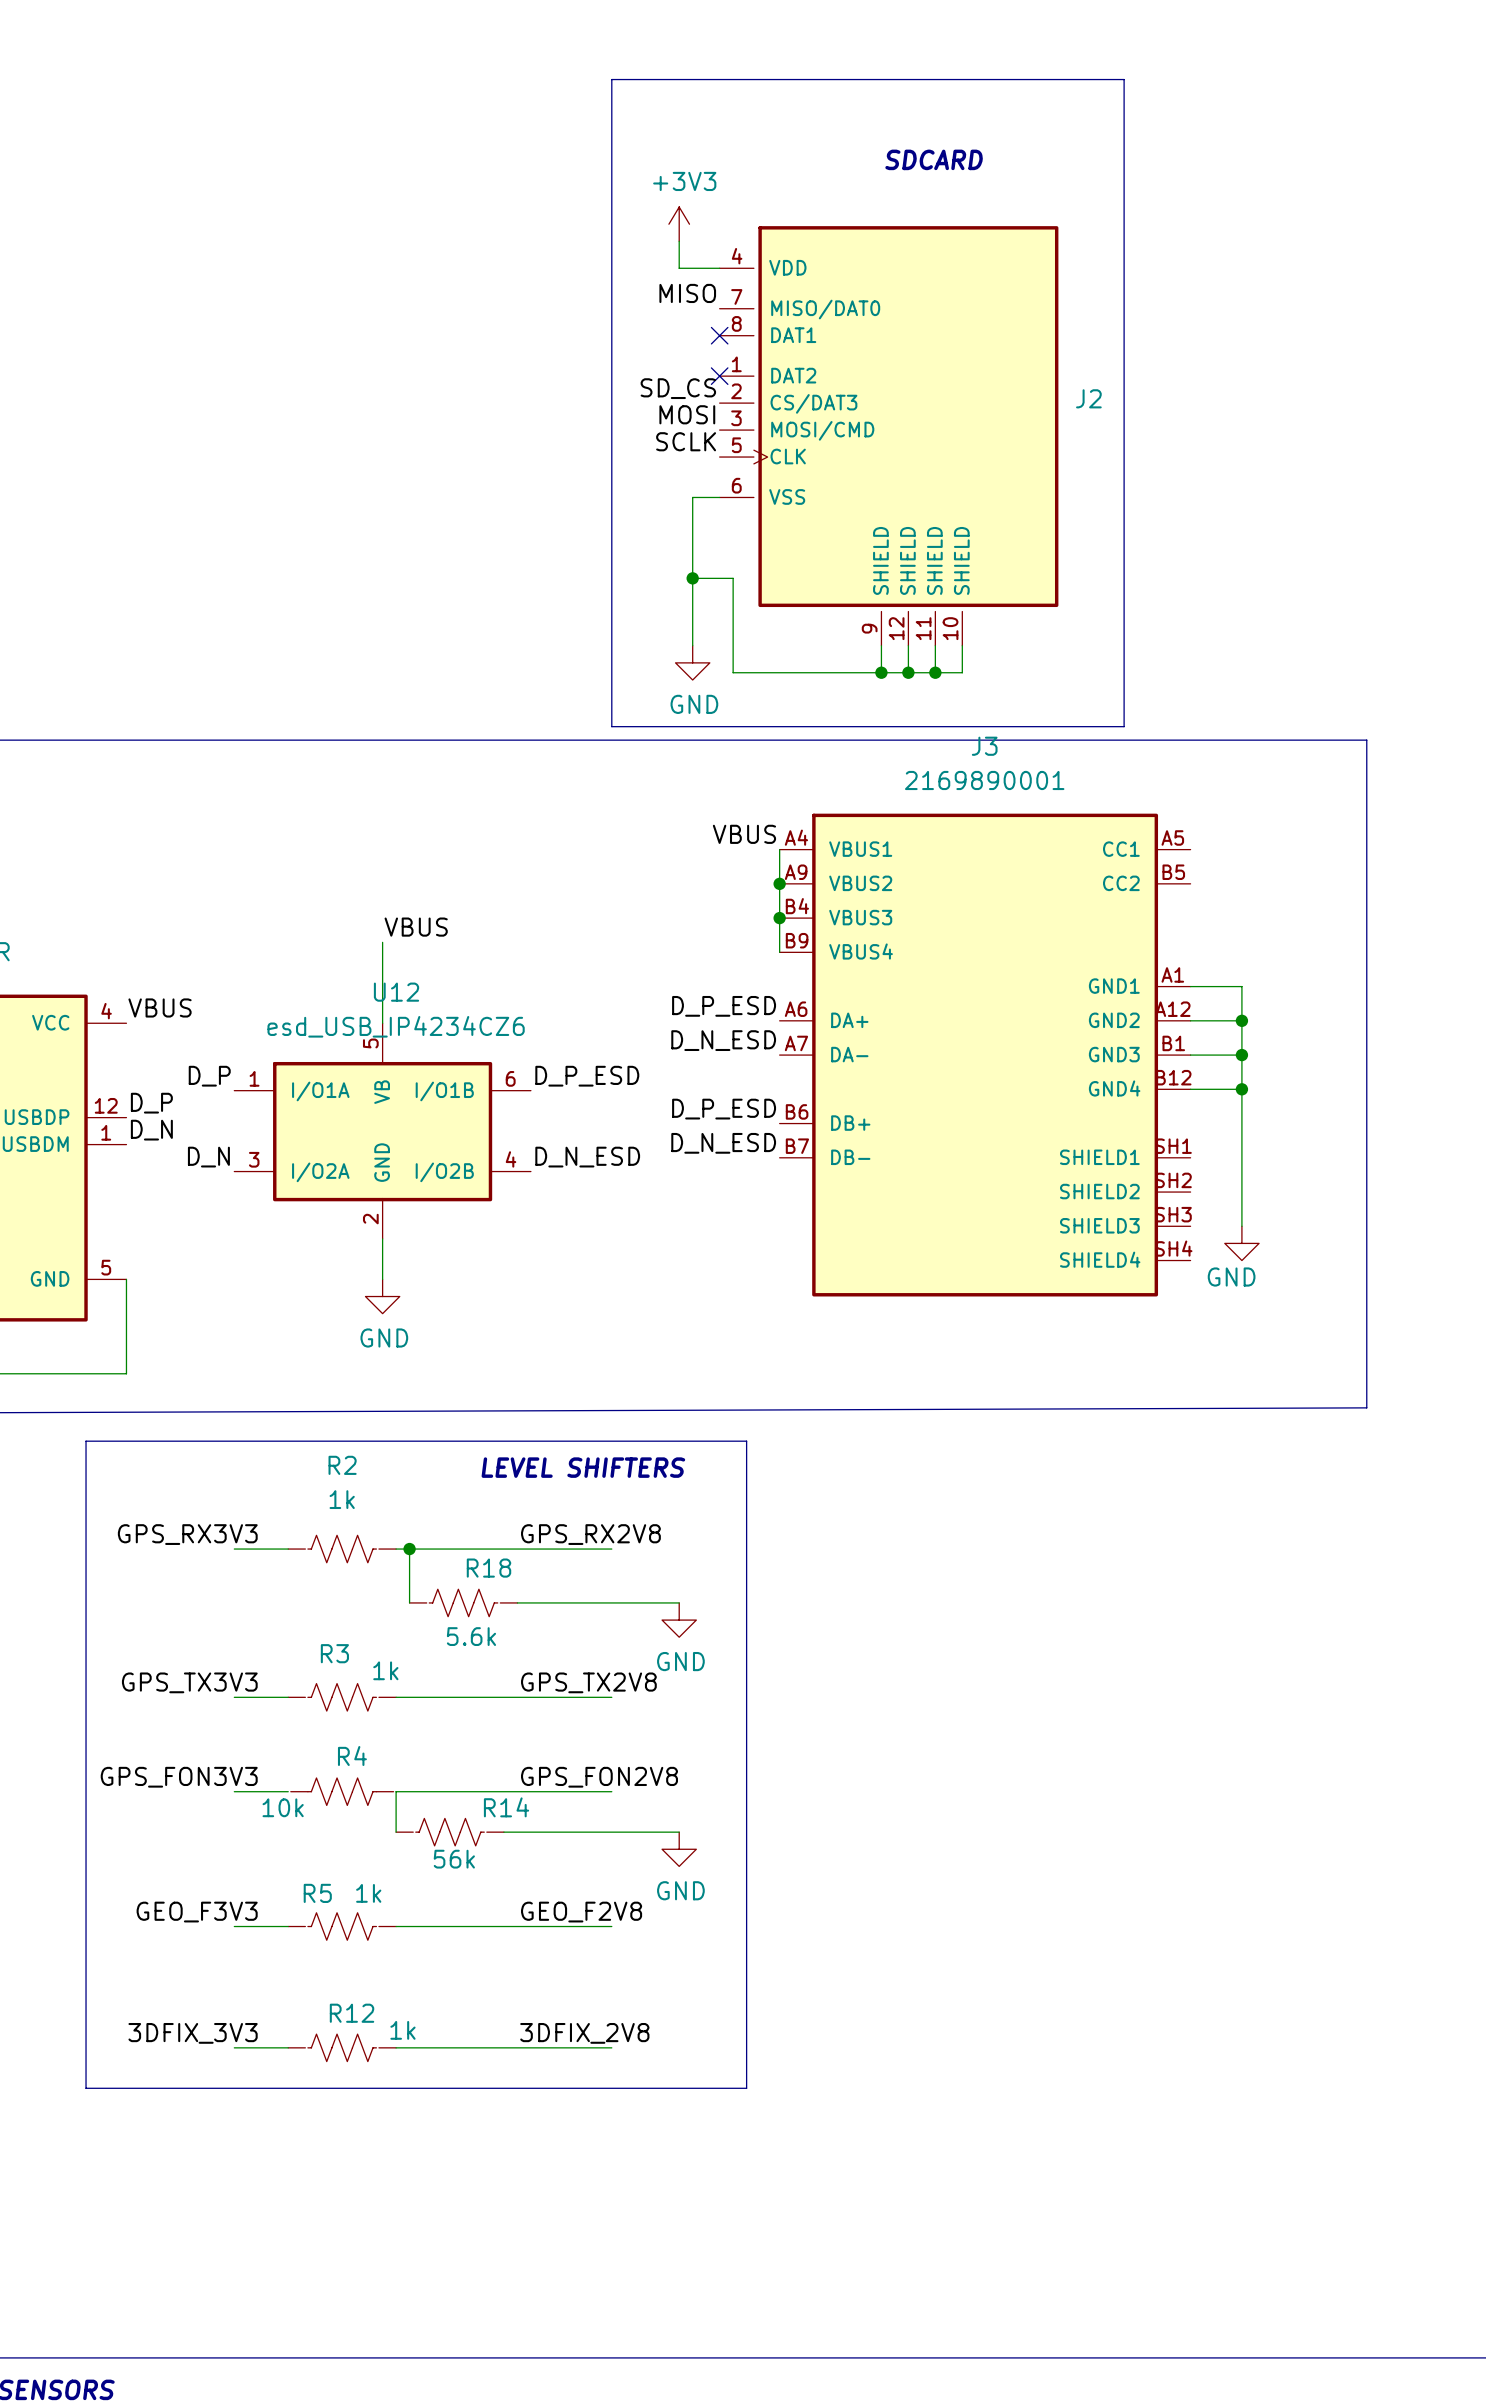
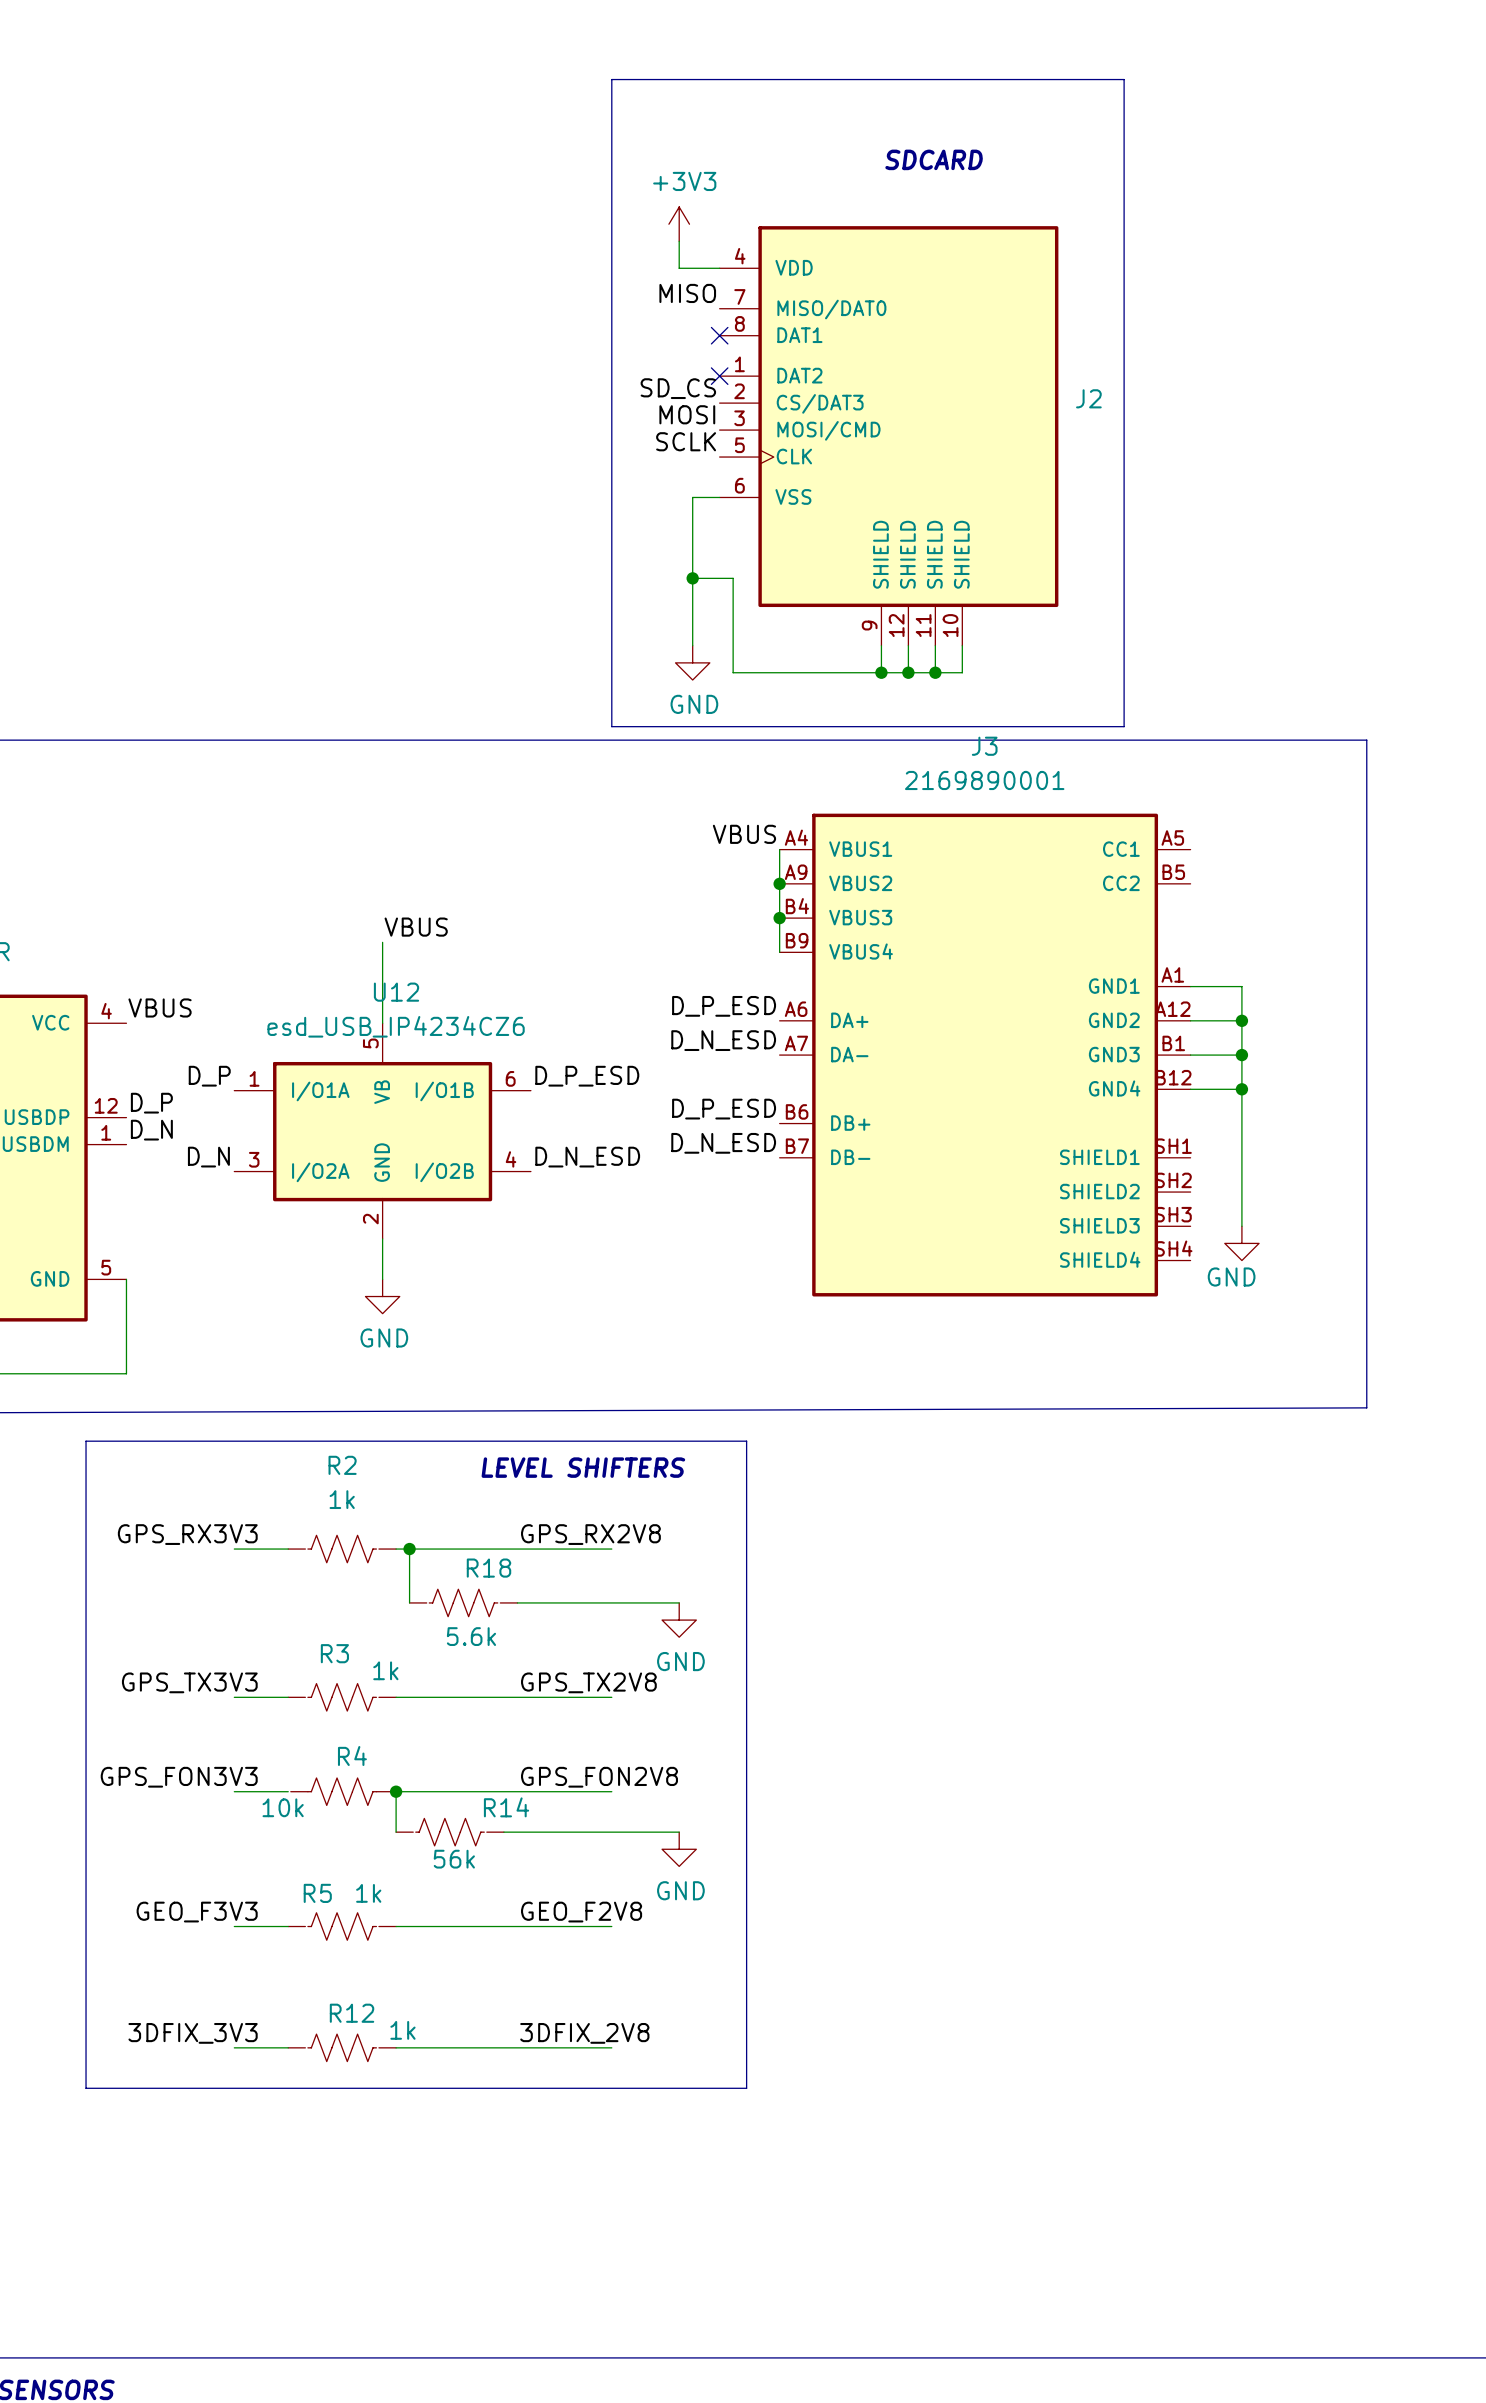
J2 symbol: [719, 226, 1059, 646] -> [719, 226, 1059, 646]
junction: none -> (396, 1791)

